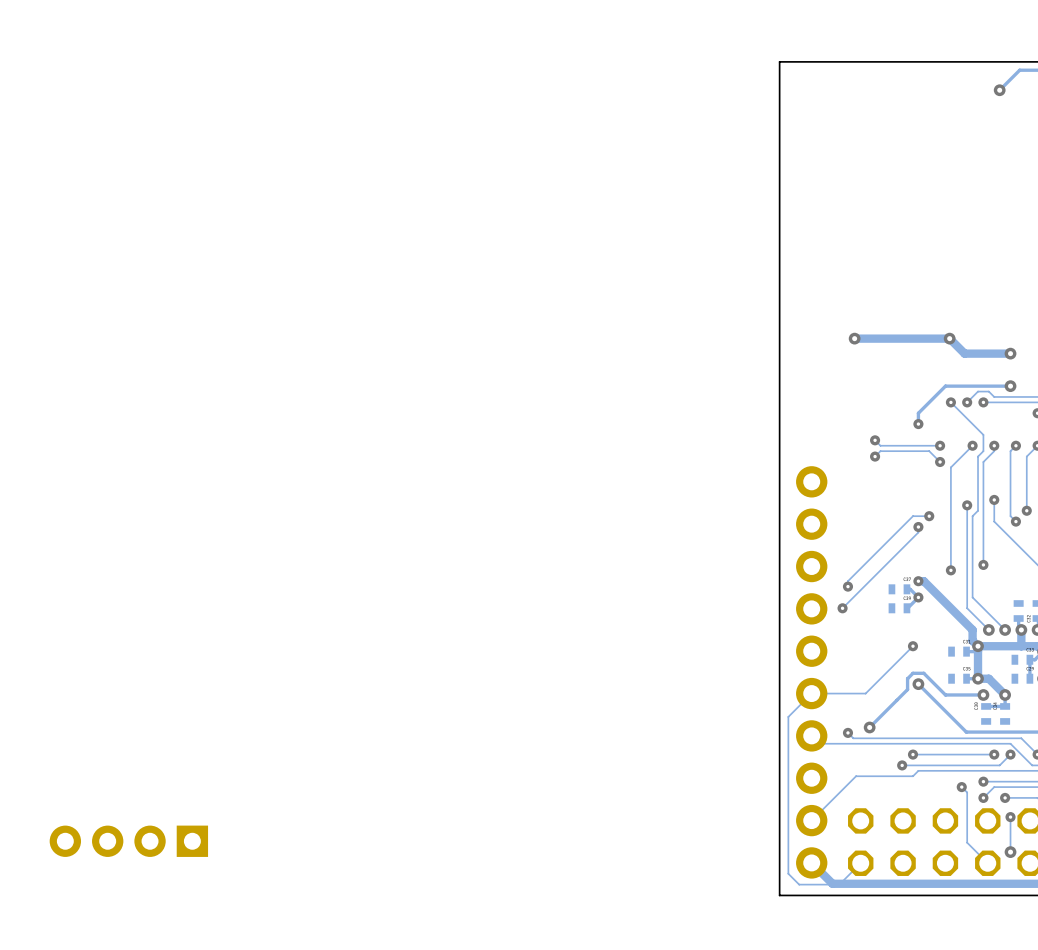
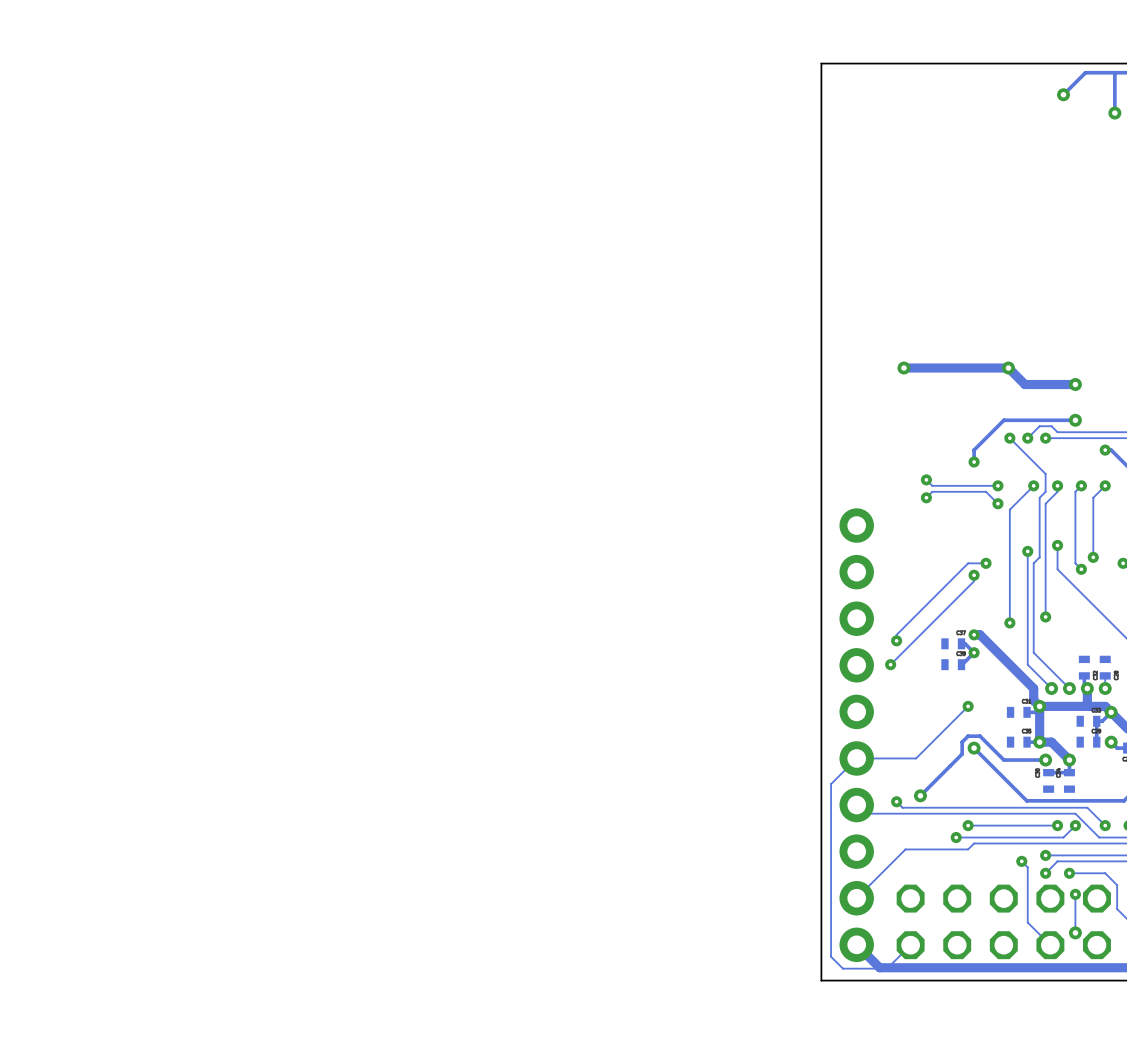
part: (128, 841) -> none

